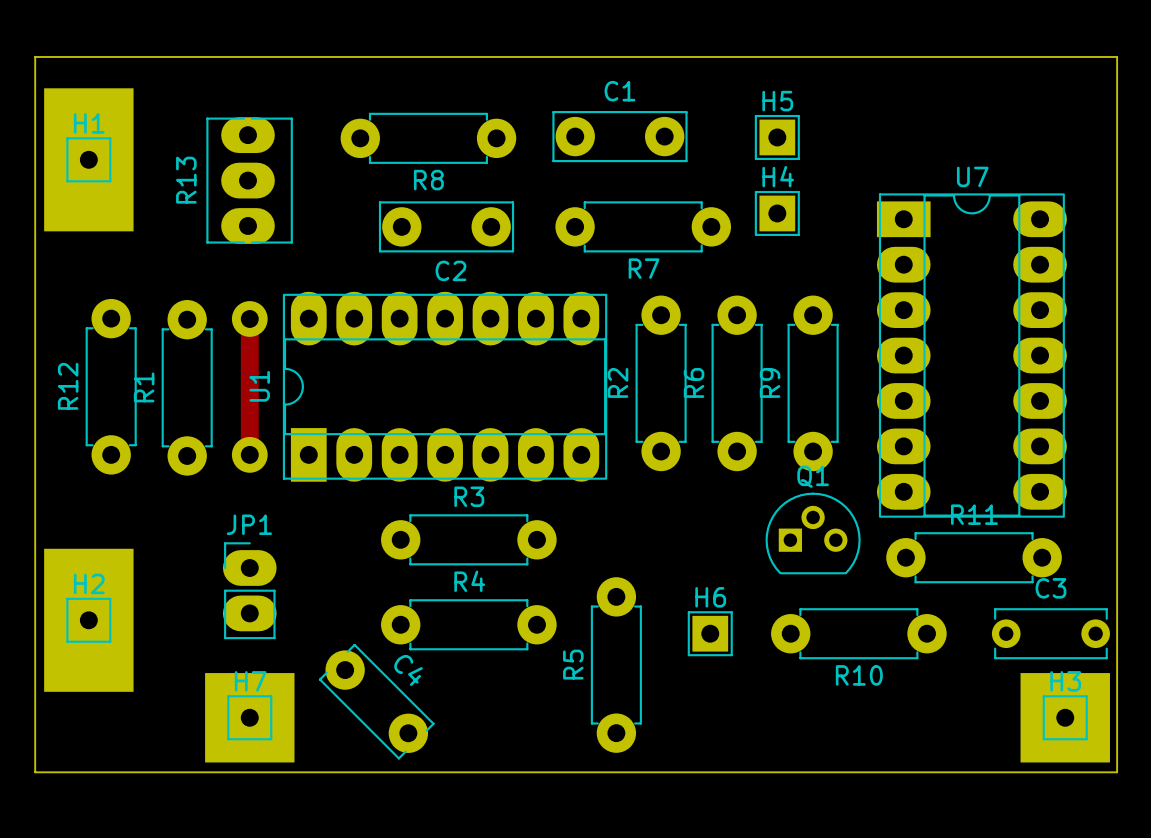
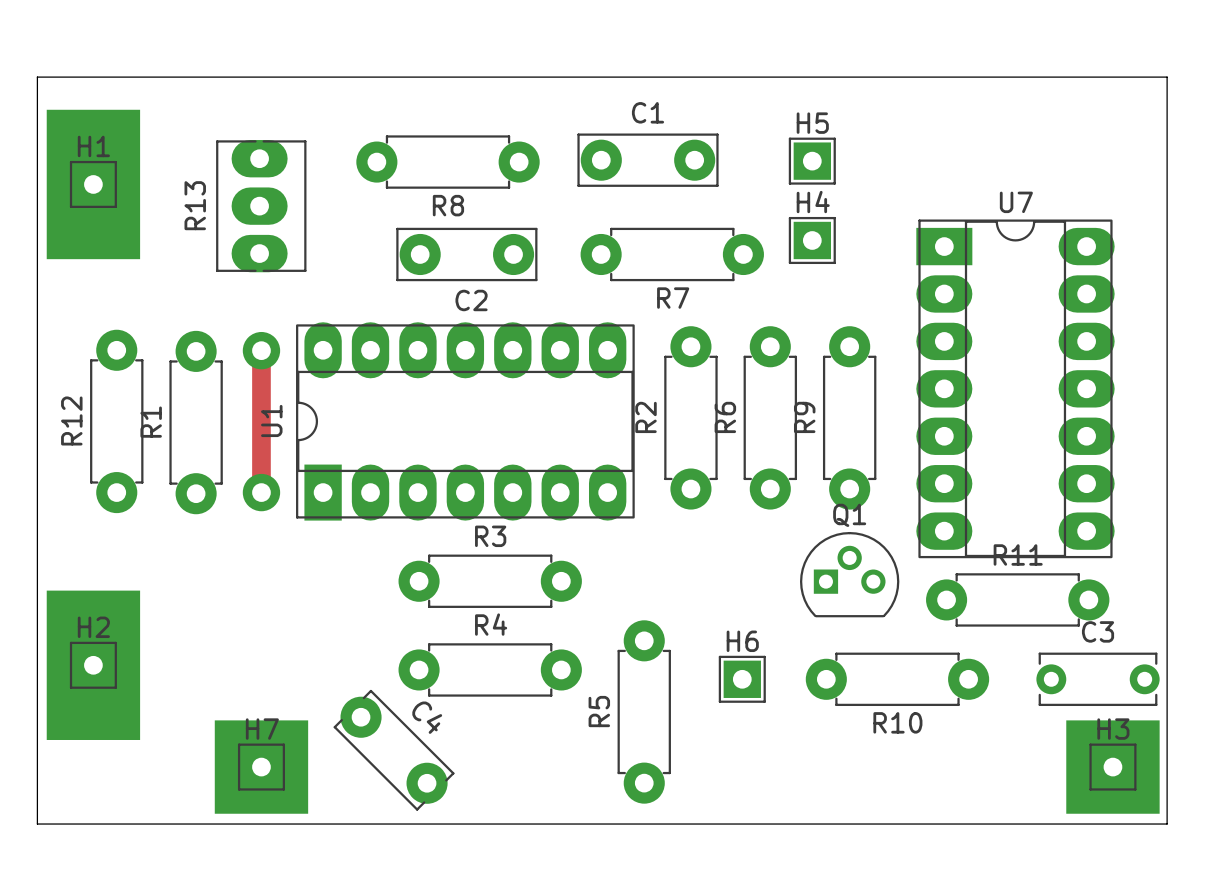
JP1: (249, 590) -> none

